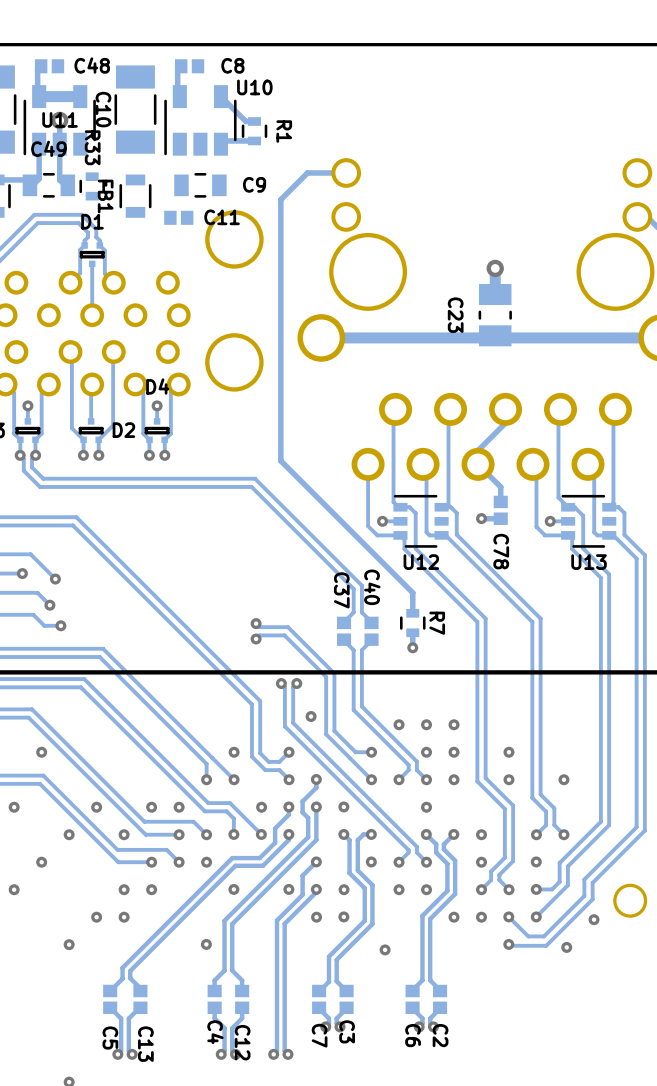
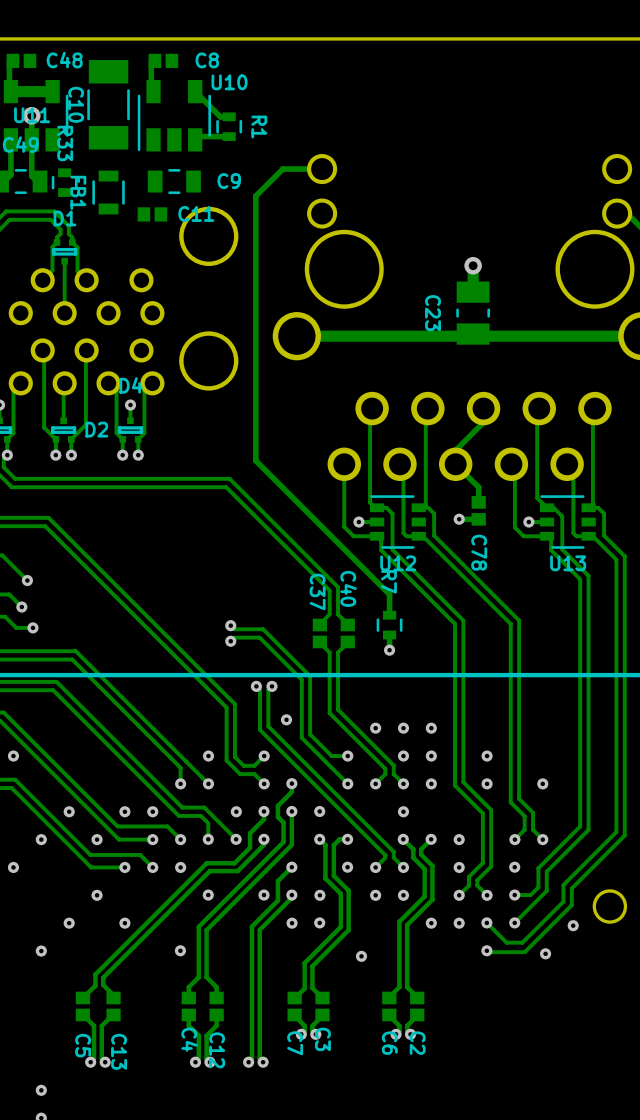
R7 name position: R7 (437, 623) -> R7 (388, 581)
via: (151, 889) -> none
via: (124, 917) -> none
via: none -> (124, 923)

